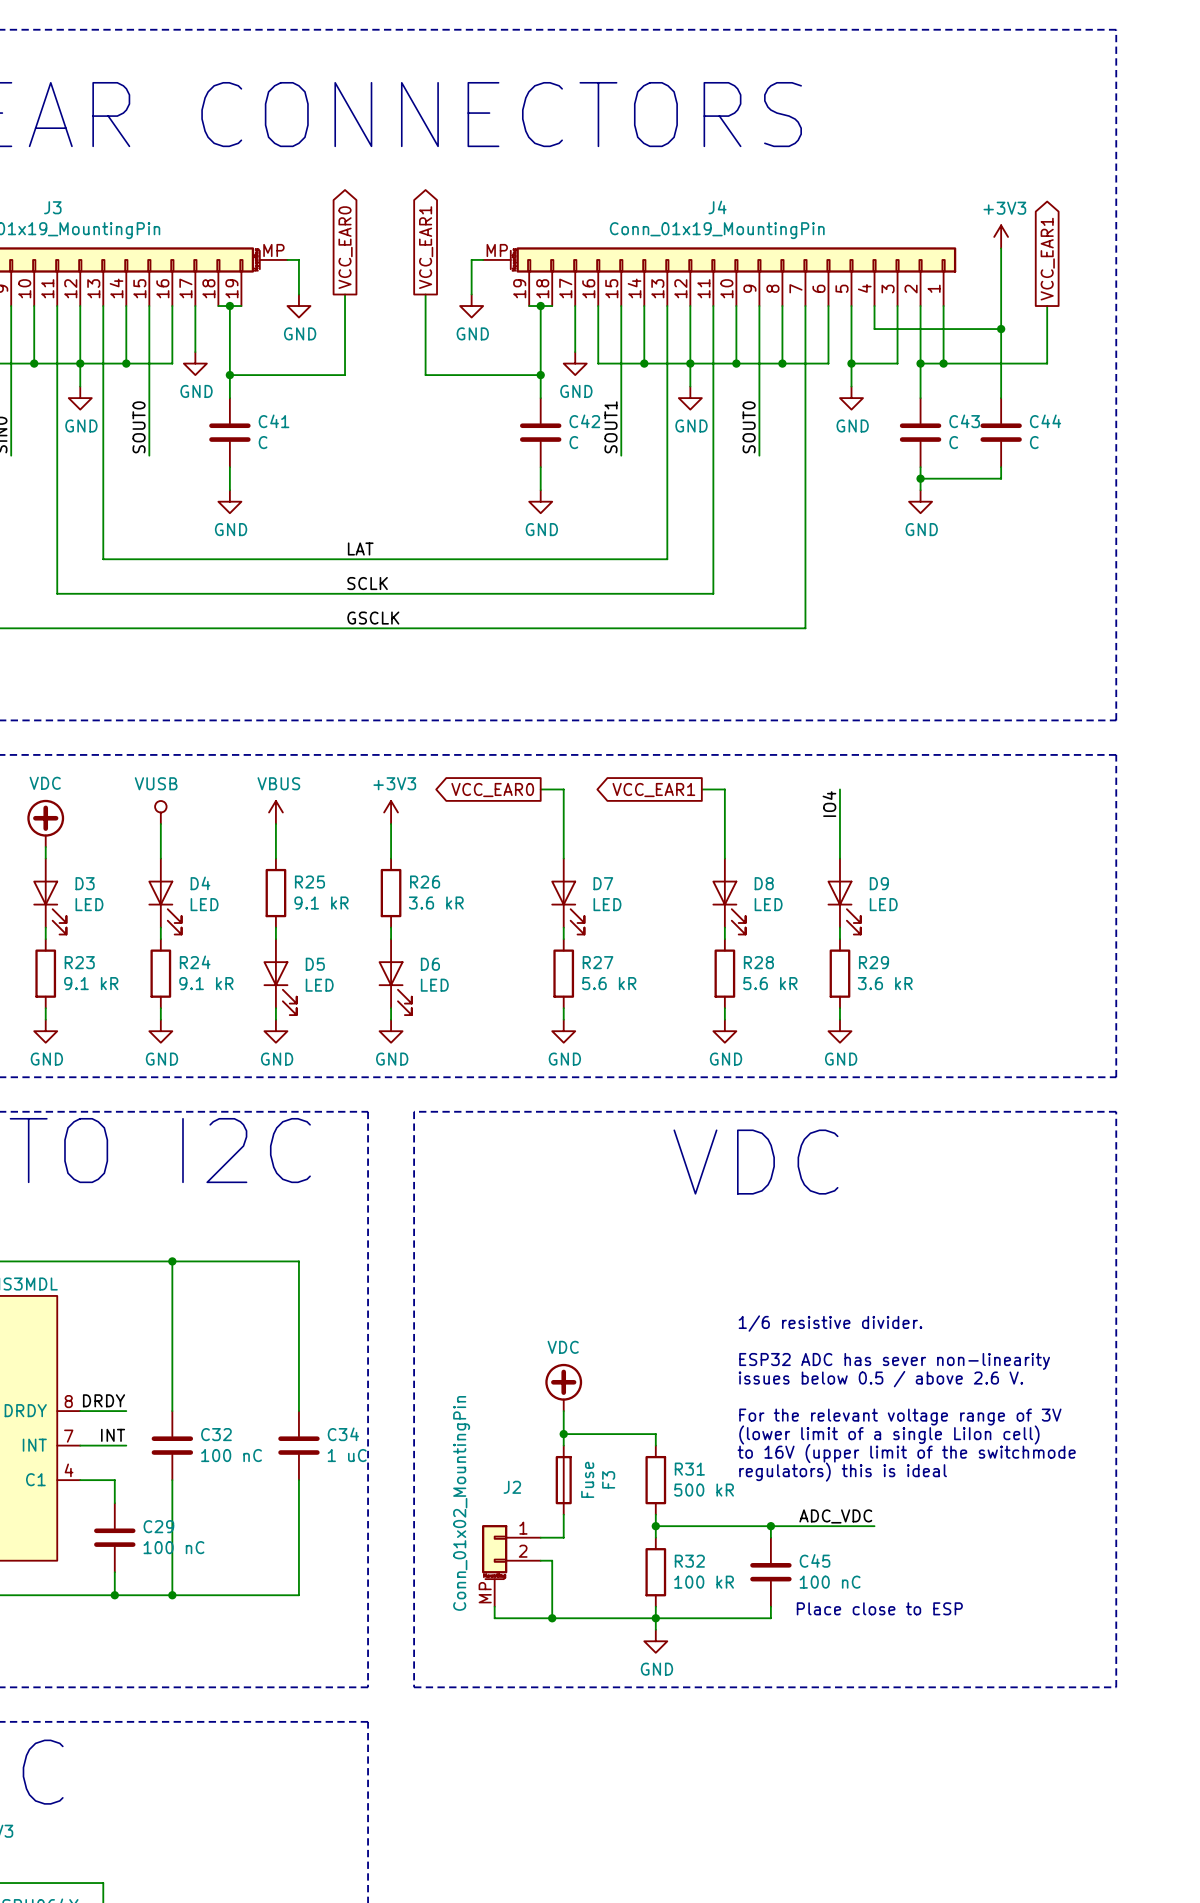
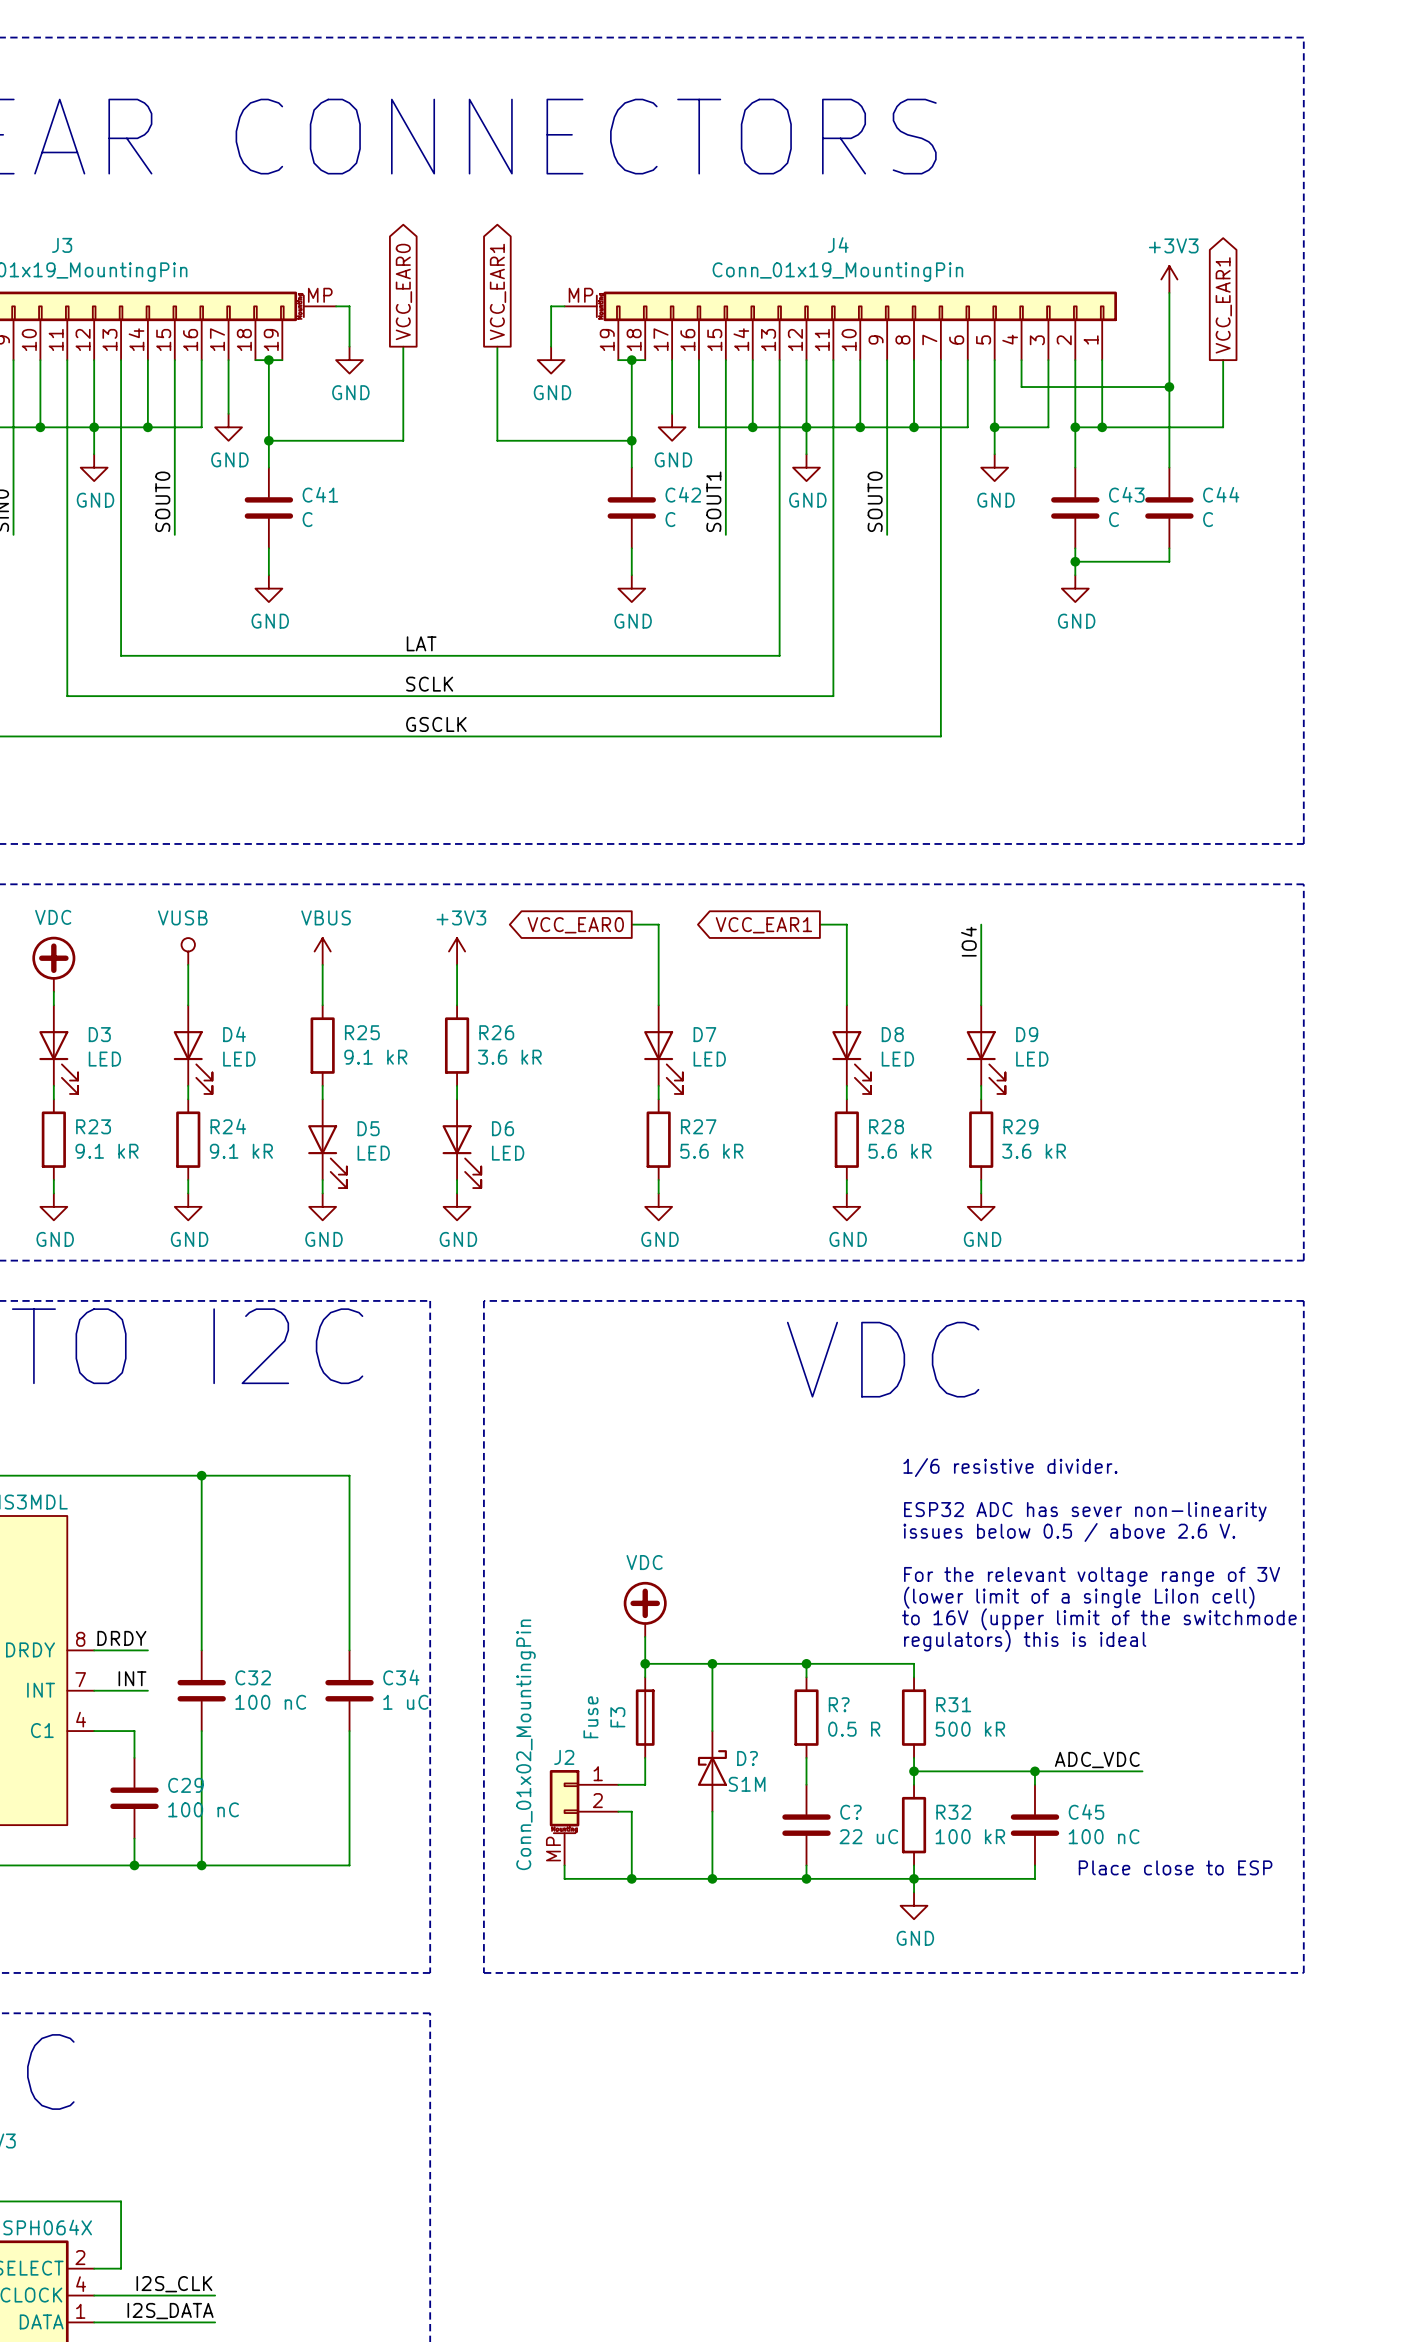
text position: 1/6 resistive divider. (830, 1323) -> 1/6 resistive divider. (1010, 1467)
text position: ESP32 ADC has sever non-linearity (894, 1361) -> ESP32 ADC has sever non-linearity (1085, 1511)
text position: issues below 0.5 / above 2.6 V. (880, 1379) -> issues below 0.5 / above 2.6 V. (1069, 1532)
power symbol position: VDC (563, 1387) -> VDC (645, 1609)
wire: (563, 1411) (563, 1445) -> (645, 1636) (645, 1677)
text position: For the relevant voltage range of 3V (900, 1417) -> For the relevant voltage range of 3V (1092, 1576)
wire: none -> (645, 1663) (914, 1663) (914, 1677)
wire: none -> (712, 1663) (712, 1731)
junction: none -> (712, 1663)
wire: none -> (806, 1663) (806, 1677)
junction: none -> (806, 1663)
wire: (563, 1434) (655, 1434) (655, 1445) -> none
junction position: (563, 1434) -> (645, 1663)
text position: (lower limit of a single LiIon cell) (889, 1435) -> (lower limit of a single LiIon cell) (1079, 1597)
text position: to 16V (upper limit of the switchmode (906, 1453) -> to 16V (upper limit of the switchmode (1099, 1619)
R?: none -> 0.5 R (806, 1717)
text position: regulators) this is ideal (843, 1472) -> regulators) this is ideal (1025, 1640)
F3 value position: Fuse (587, 1479) -> Fuse (590, 1717)
F3 name position: F3 (608, 1479) -> F3 (617, 1717)
F3 position: (563, 1480) -> (645, 1717)
R31 position: (655, 1480) -> (914, 1717)
J2 name position: J2 (512, 1487) -> J2 (564, 1757)
wire: none -> (806, 1757) (806, 1784)
wire: (563, 1514) (563, 1537) (540, 1537) -> (645, 1757) (645, 1784) (618, 1784)
D?: none -> S1M (712, 1771)
wire: (655, 1514) (655, 1537) -> (914, 1757) (914, 1784)
wire: none -> (914, 1771) (1142, 1771)
wire: none -> (1034, 1771) (1034, 1784)
junction: none -> (1034, 1771)
label position: ADC_VDC (835, 1516) -> ADC_VDC (1097, 1760)
wire: (655, 1526) (874, 1526) -> none
junction: (655, 1526) -> none
wire: (770, 1526) (770, 1537) -> (806, 1865) (806, 1878)
junction position: (770, 1526) -> (914, 1771)
wire: none -> (712, 1811) (712, 1878)
wire: (540, 1560) (552, 1560) (552, 1618) -> (618, 1811) (631, 1811) (631, 1878)
C?: none -> 22 uC (806, 1825)
J2 position: (511, 1565) -> (584, 1817)
R32 position: (655, 1572) -> (914, 1825)
C45 position: (770, 1572) -> (1034, 1825)
wire: none -> (564, 1865) (564, 1878) (1034, 1878) (1034, 1865)
wire: (494, 1606) (494, 1618) (770, 1618) (770, 1606) -> none
junction: none -> (712, 1878)
wire: (655, 1606) (655, 1629) -> (914, 1865) (914, 1892)
junction: none -> (806, 1878)
junction: none -> (914, 1878)
text position: Place close to ESP (879, 1608) -> Place close to ESP (1175, 1867)
junction position: (552, 1618) -> (631, 1878)
junction: (655, 1618) -> none
power symbol position: GND (655, 1641) -> GND (914, 1905)

